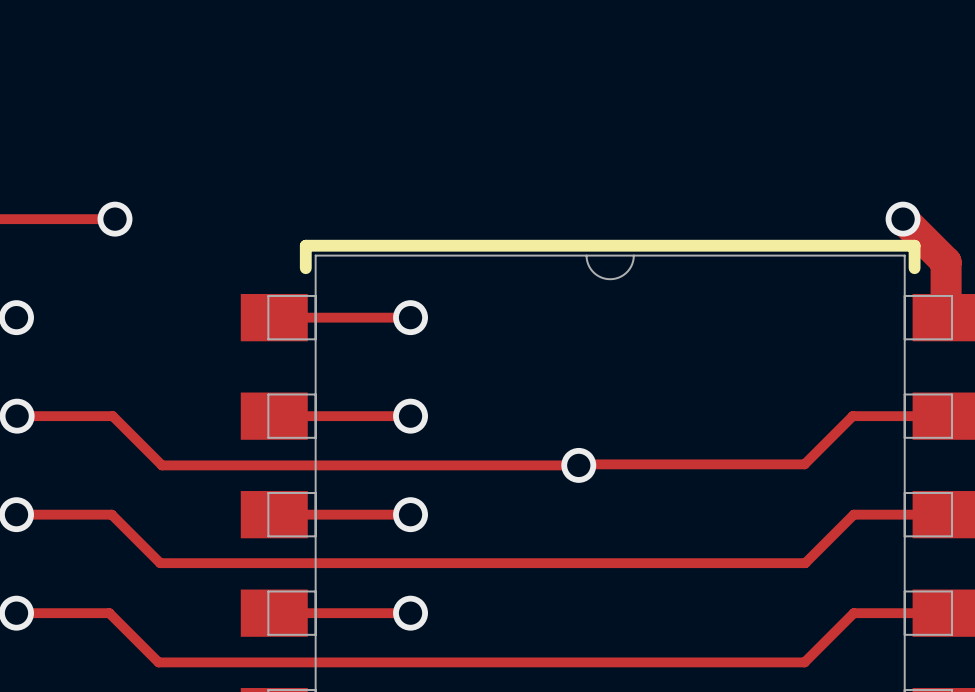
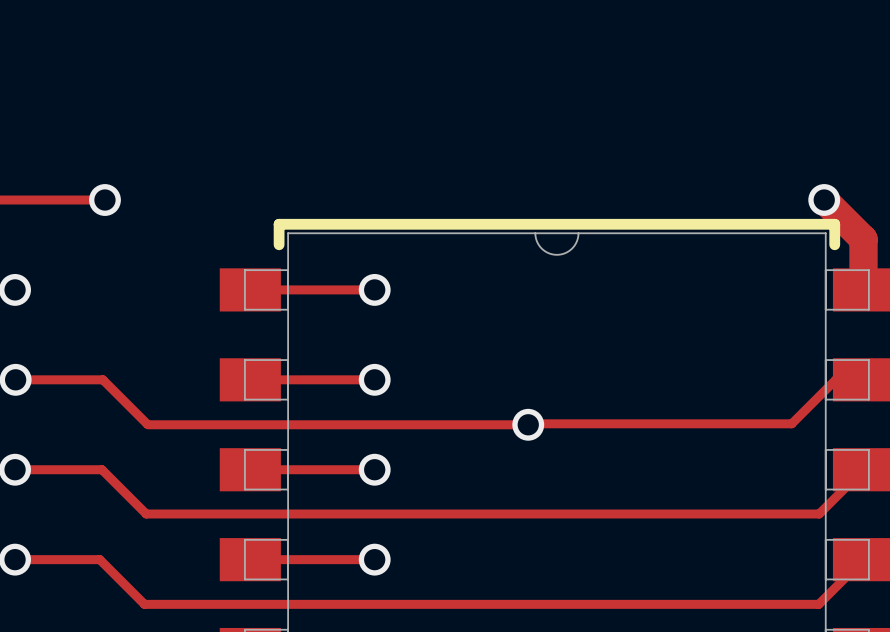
track: (915, 416) (852, 416) (804, 464) -> (835, 379) (791, 423) (734, 423)
track: (946, 514) (853, 514) (805, 563) -> (863, 469) (819, 513) (735, 513)
track: (946, 613) (853, 613) (804, 662) (158, 662) -> (863, 559) (818, 604) (144, 604)

